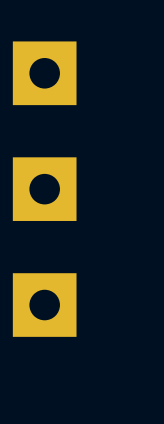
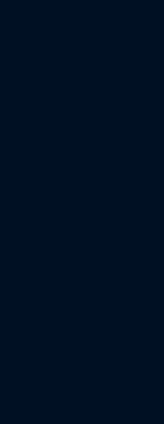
part: (44, 73) -> none
part: (44, 189) -> none
part: (44, 305) -> none

